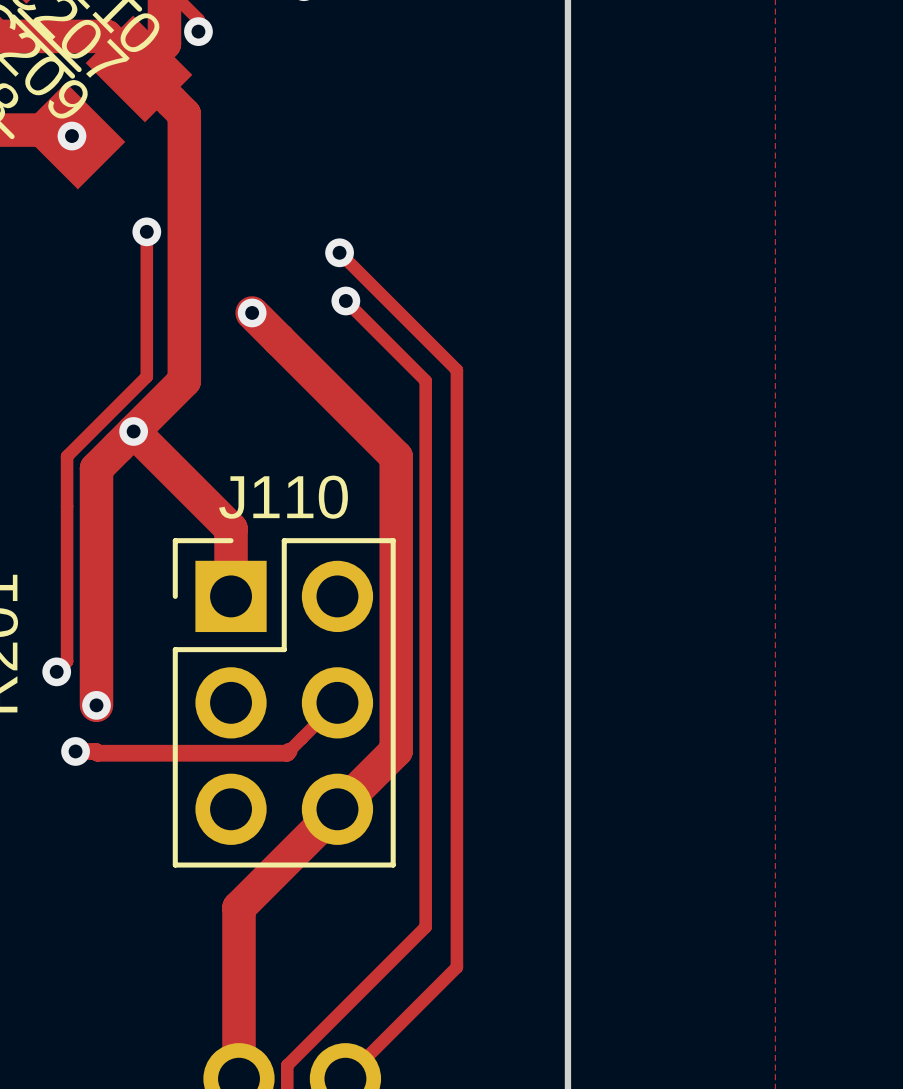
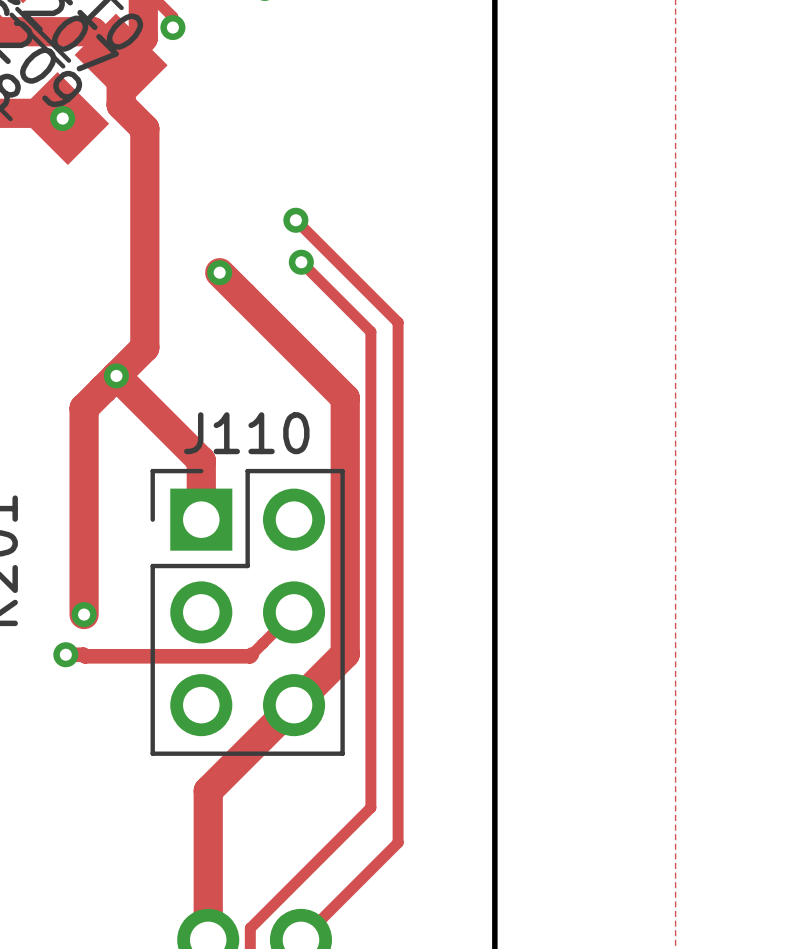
track: (139, 69) (184, 114) (184, 380) (166, 398) -> (121, 60) (121, 105) (144, 128) (144, 347)
track: (146, 231) (146, 376) (67, 456) (67, 661) (56, 671) -> none
via: (146, 231) -> none
via: (56, 671) -> none

